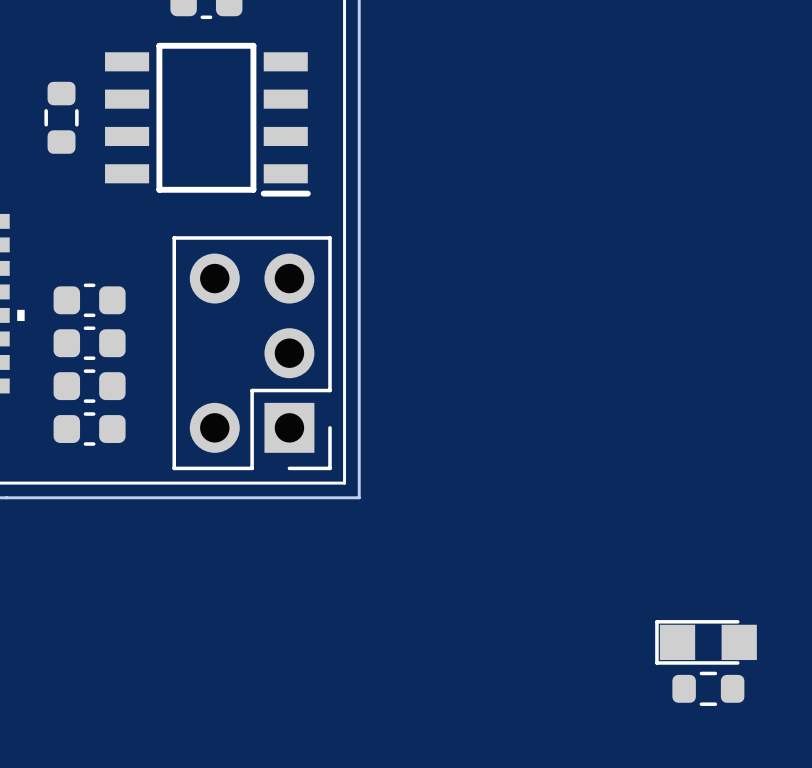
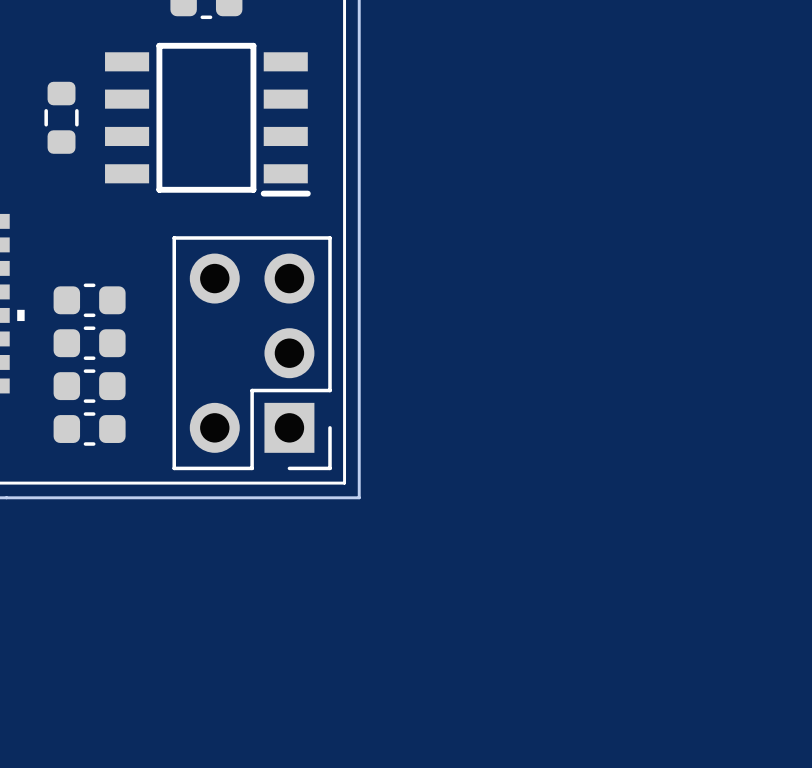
part: (706, 642) -> none
part: (708, 688) -> none

